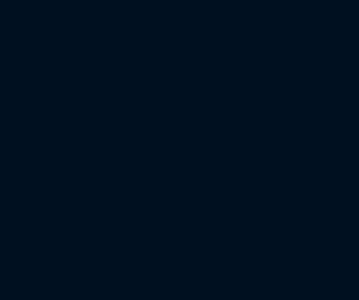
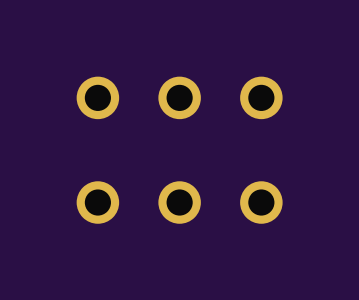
part: none -> (179, 150)

